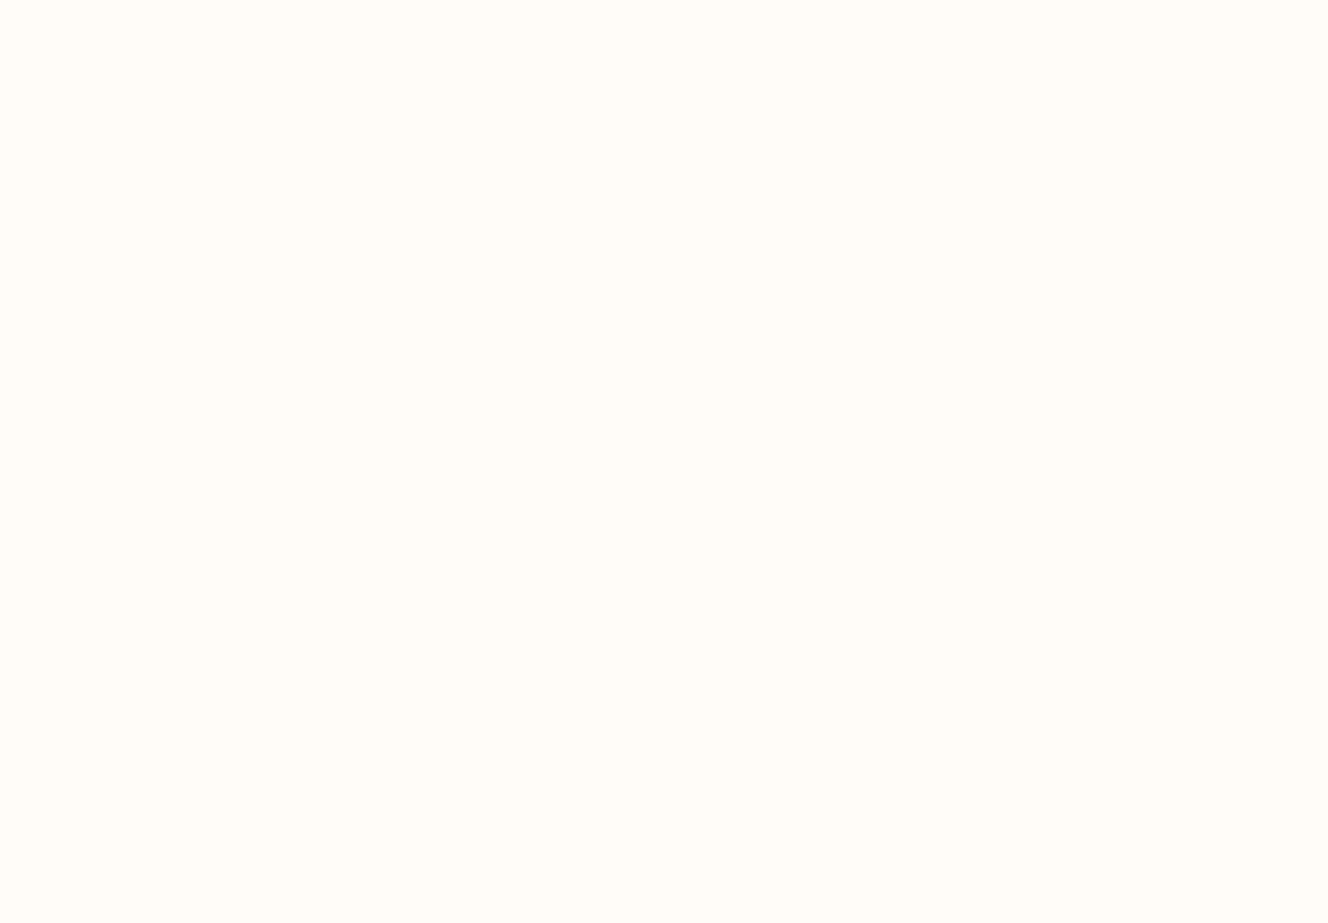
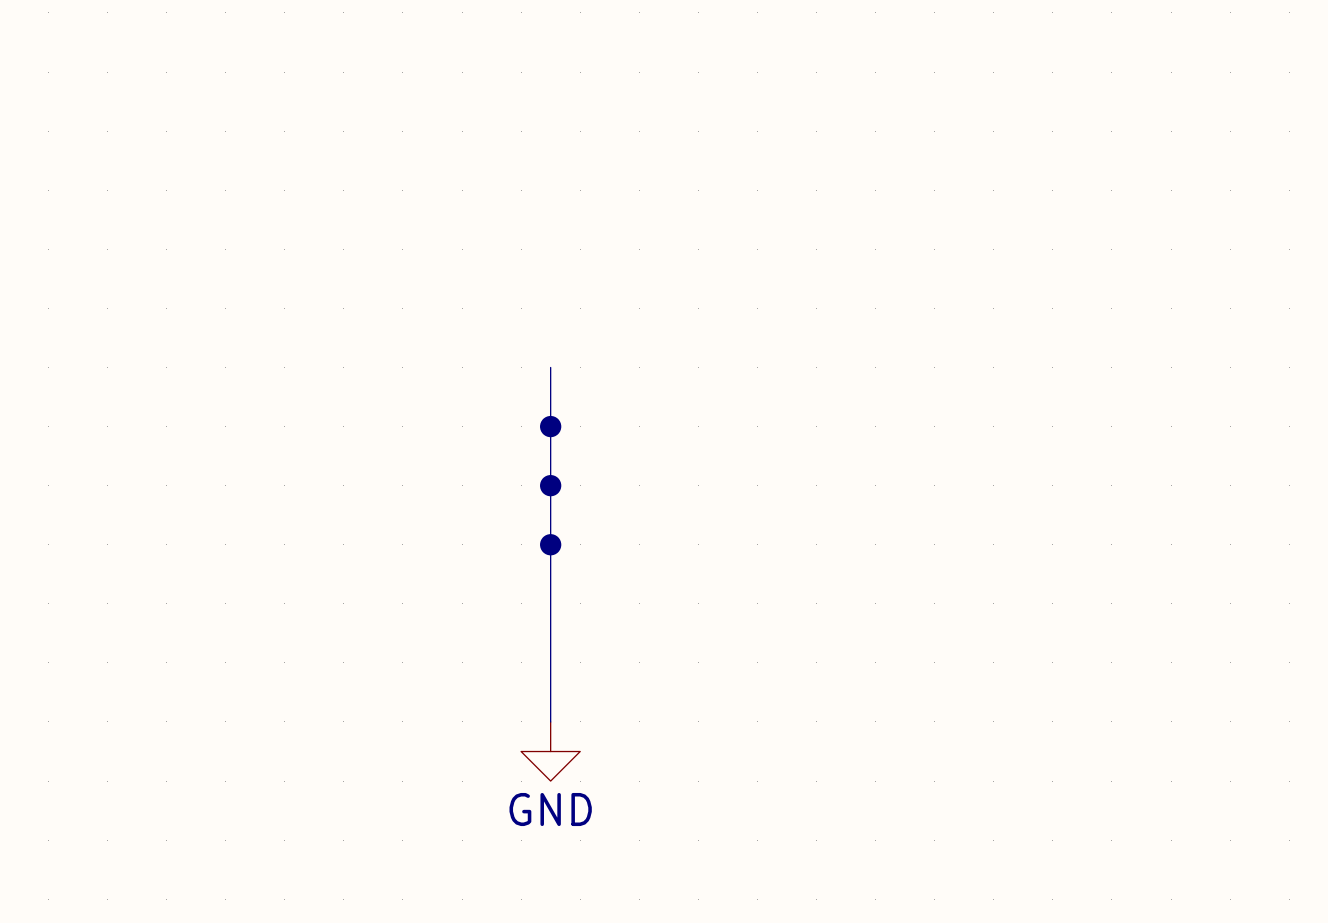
wire: none -> (550, 367) (550, 721)
junction: none -> (550, 426)
junction: none -> (550, 485)
junction: none -> (550, 544)
power symbol: none -> GND (550, 751)

